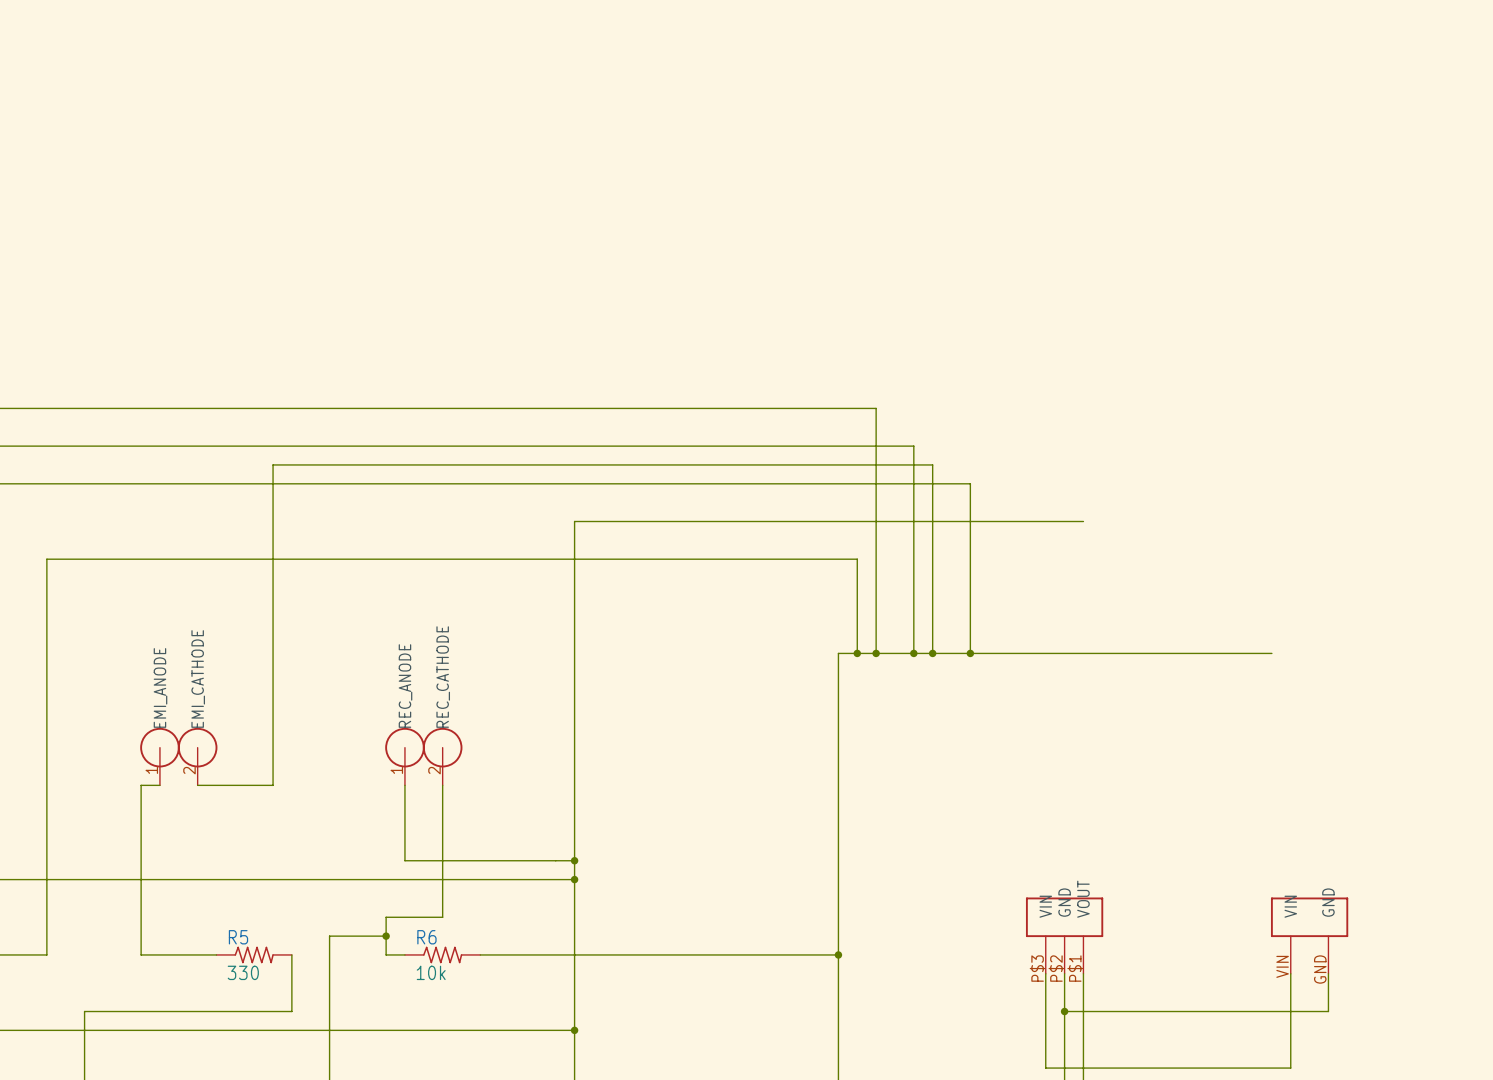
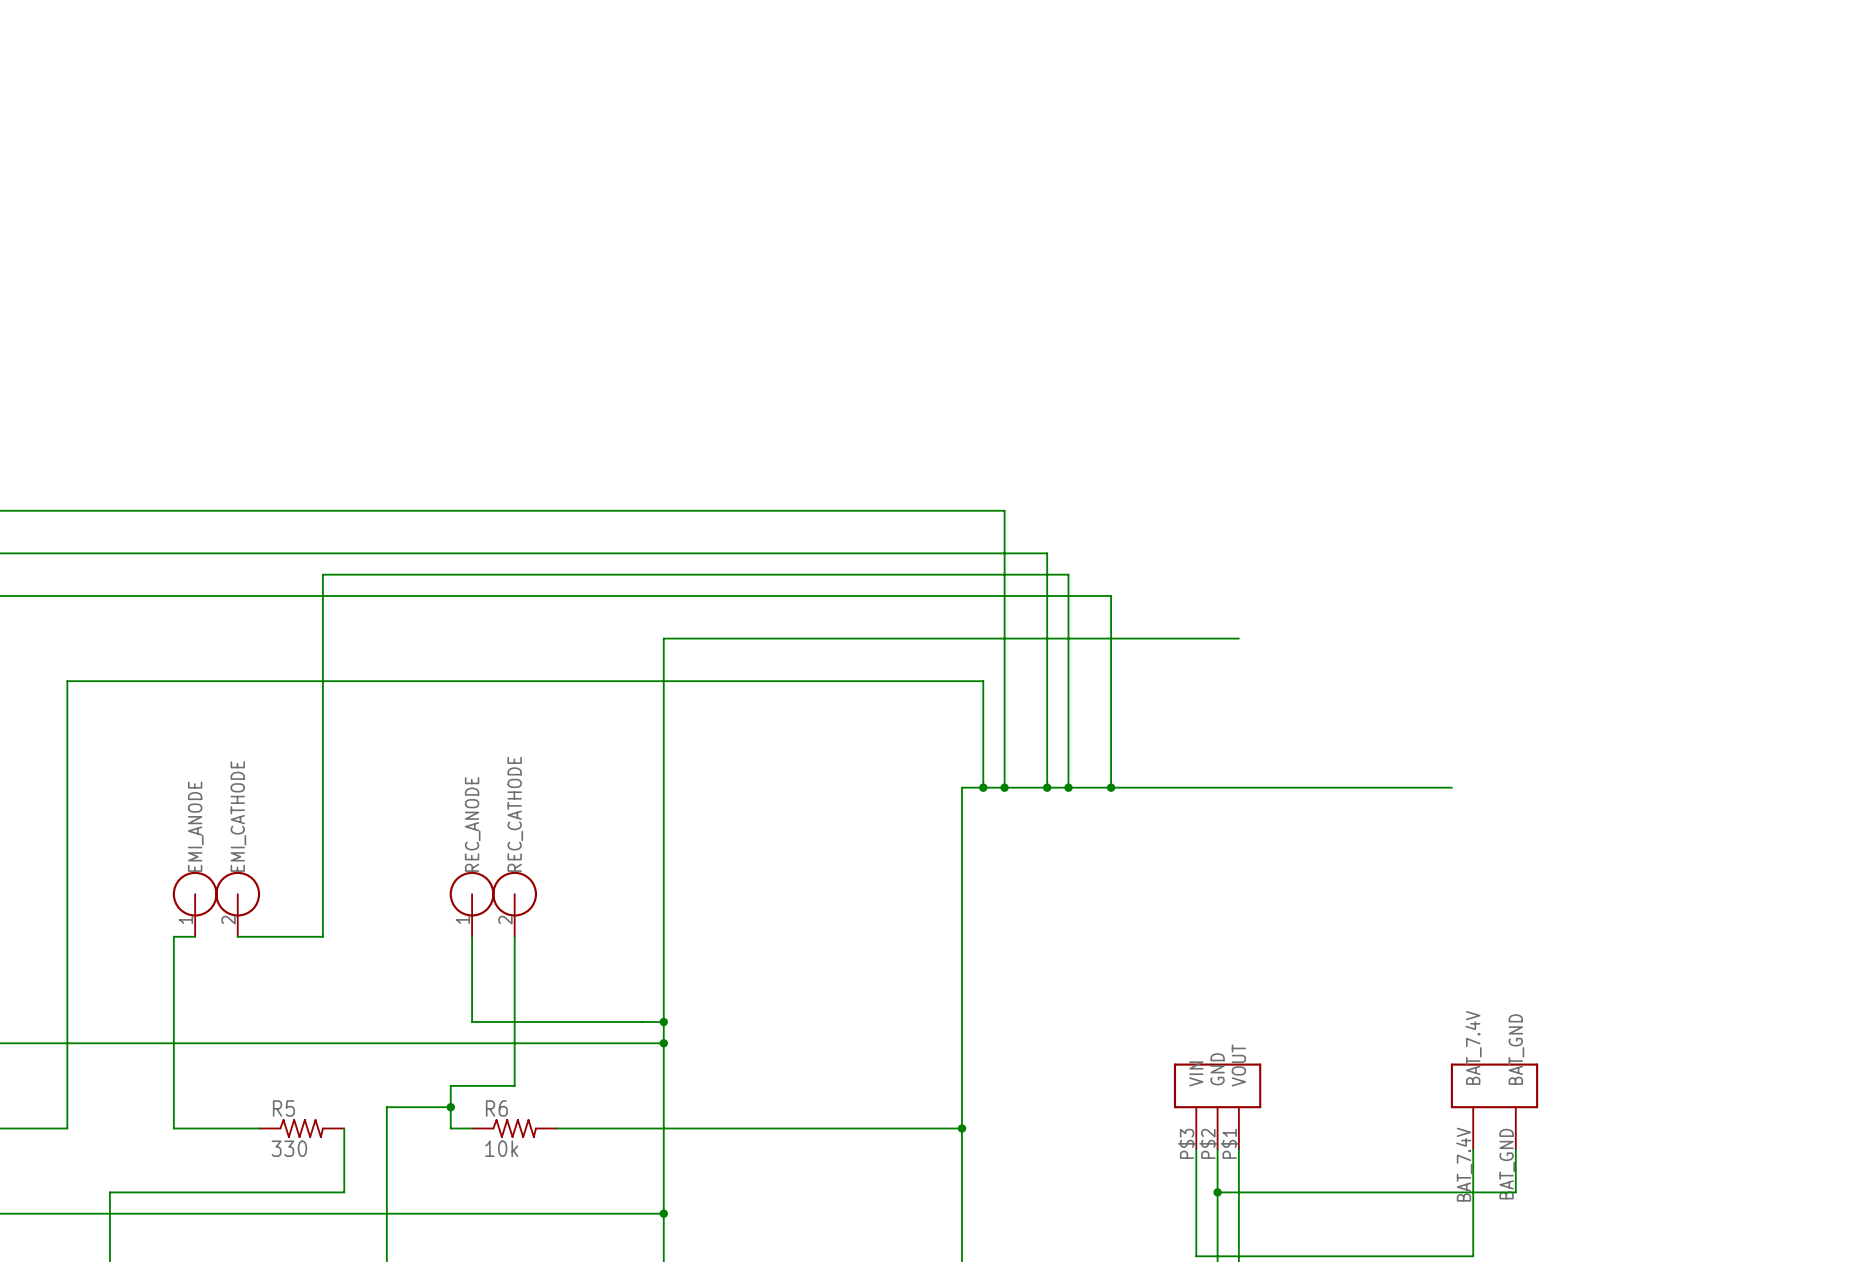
part pin name: GND (1328, 902) -> BAT_GND (1516, 1049)
part pin name: VIN (1290, 906) -> BAT_7.4V (1473, 1047)
part pin number: VIN (1282, 966) -> BAT_7.4V (1464, 1164)
part pin number: GND (1320, 969) -> BAT_GND (1507, 1164)

